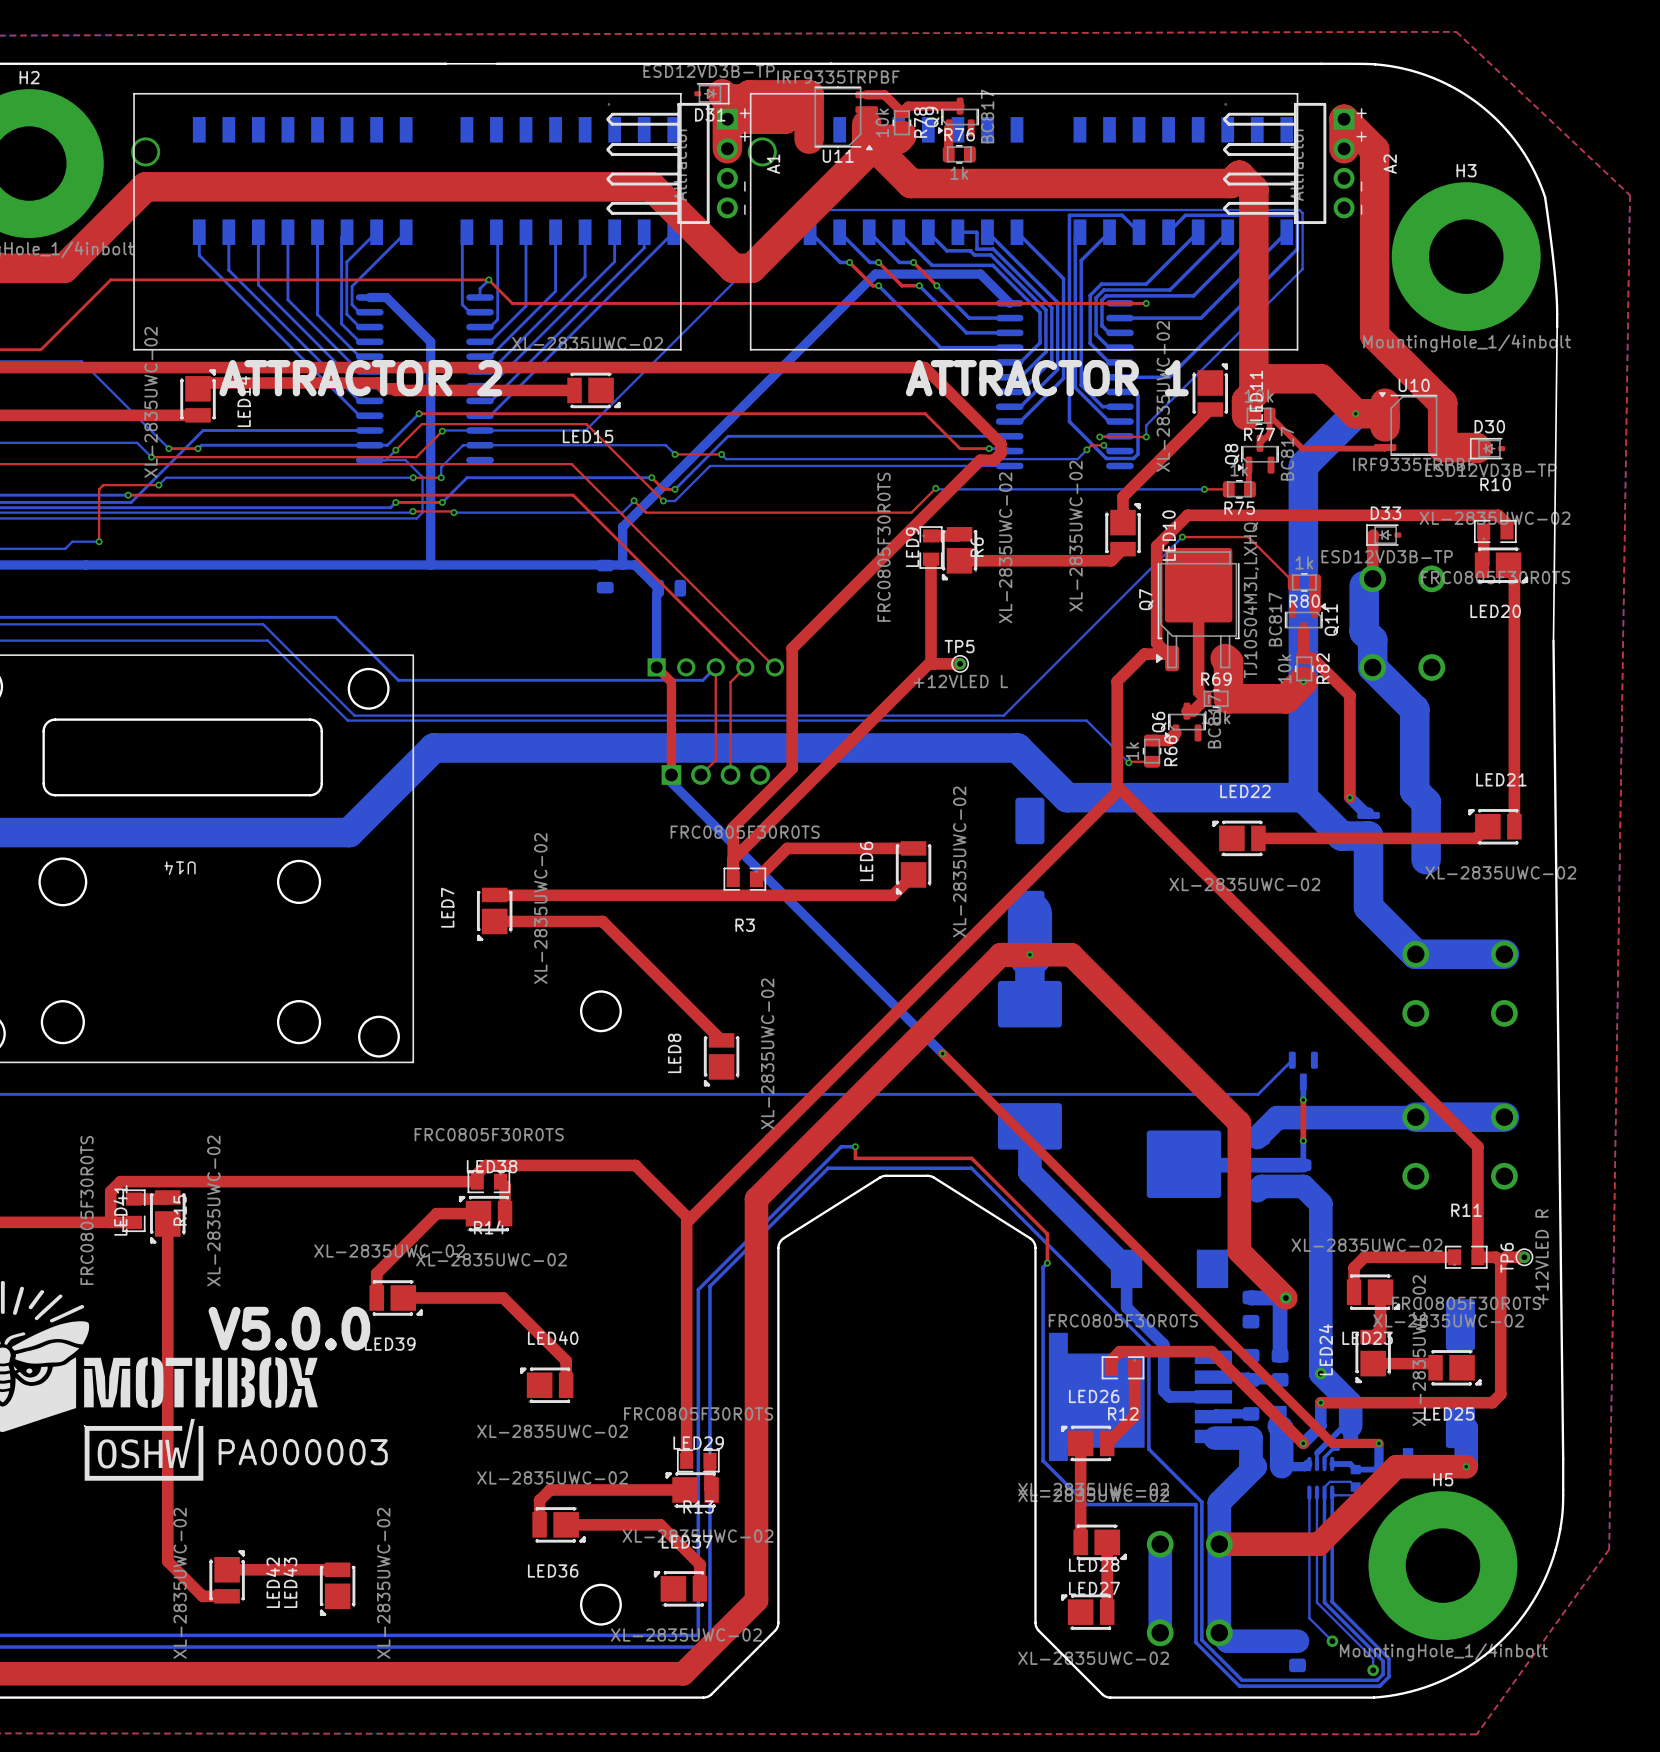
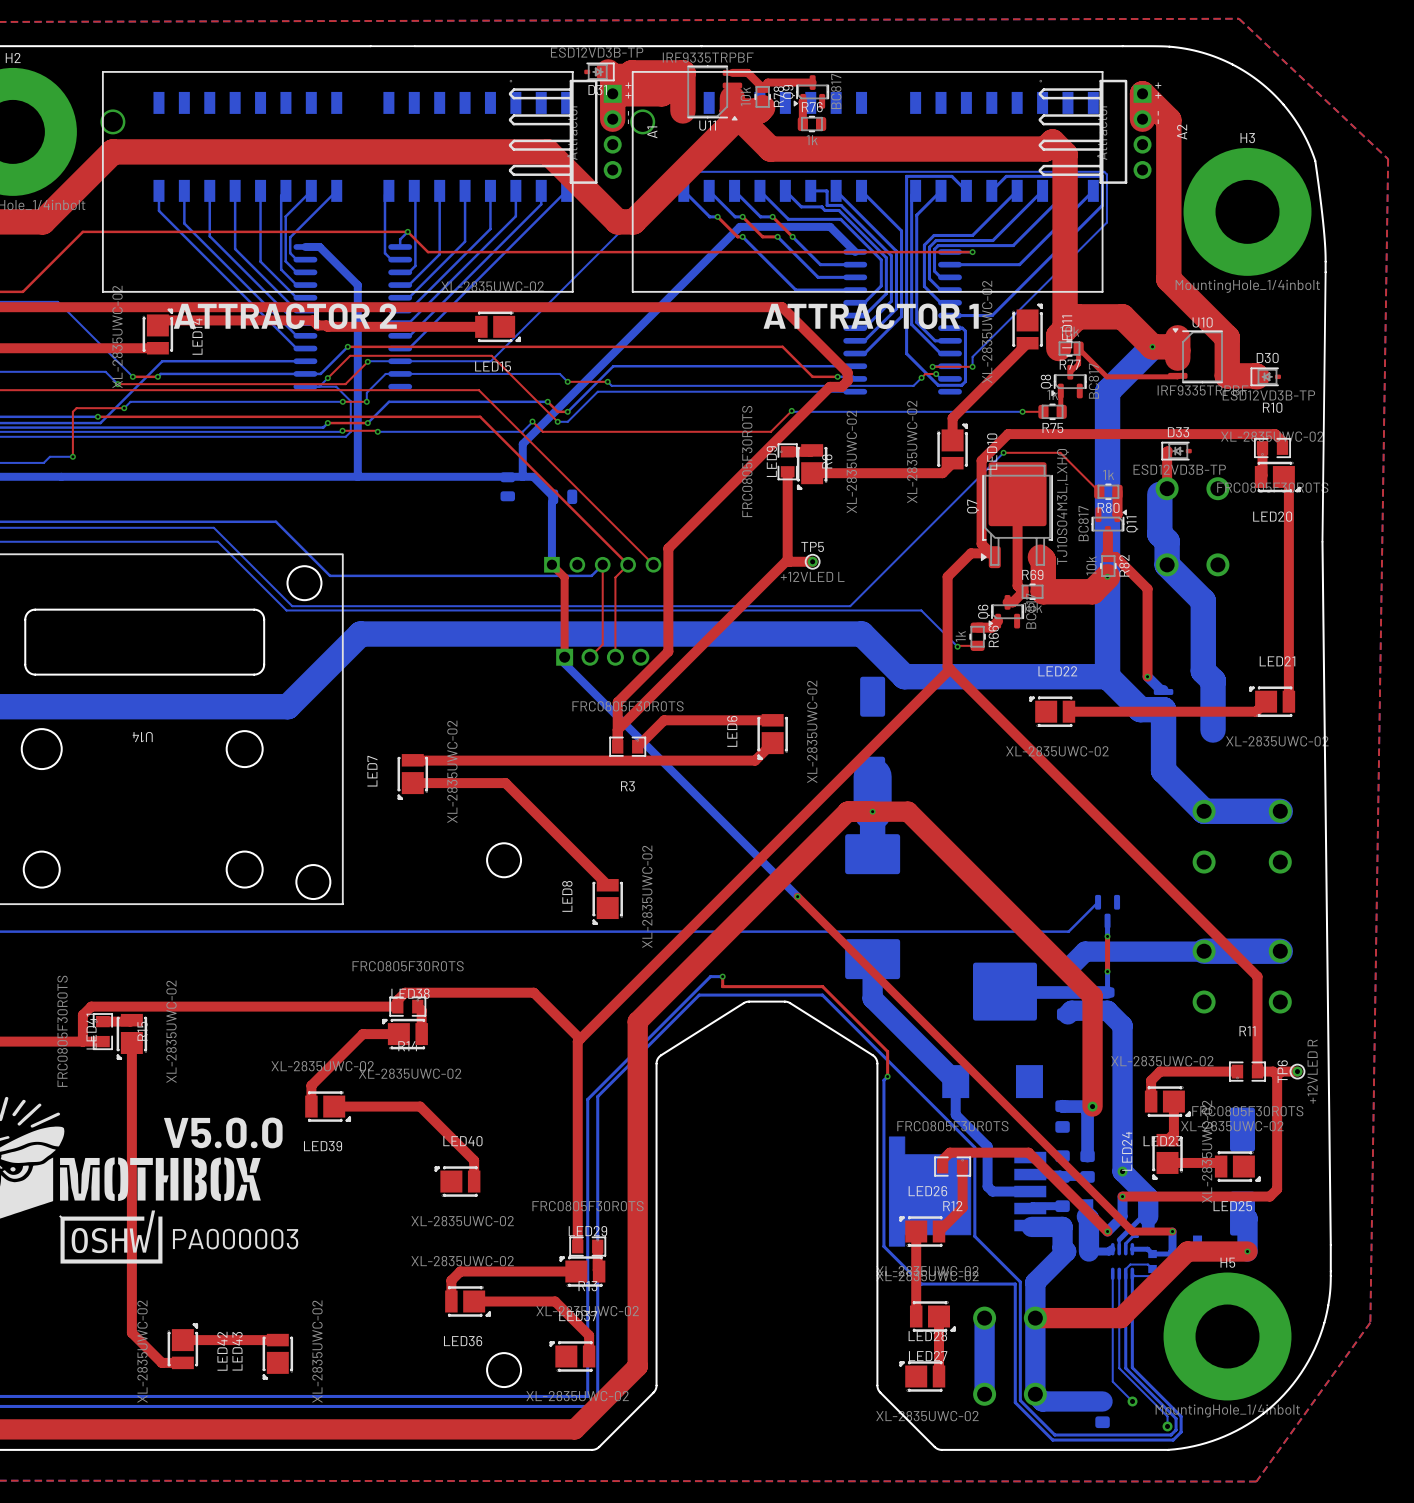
top track: (1239, 1122) (1239, 1251) (1285, 1297) -> (1052, 956) (1092, 996) (1092, 1106)

